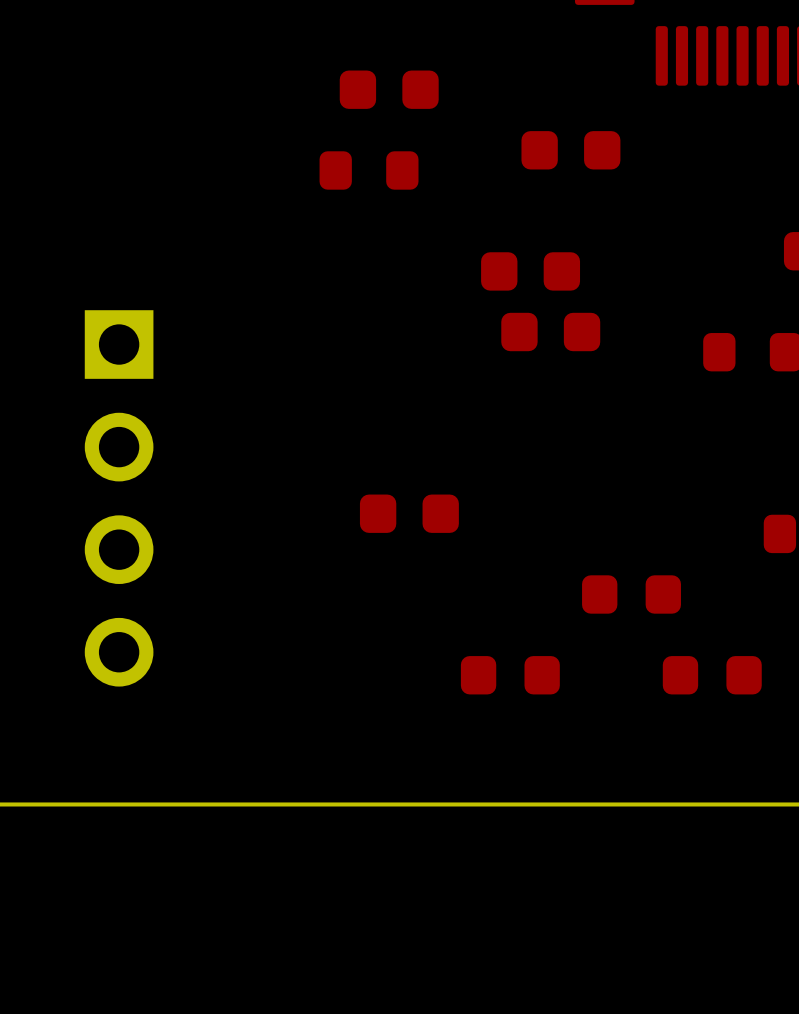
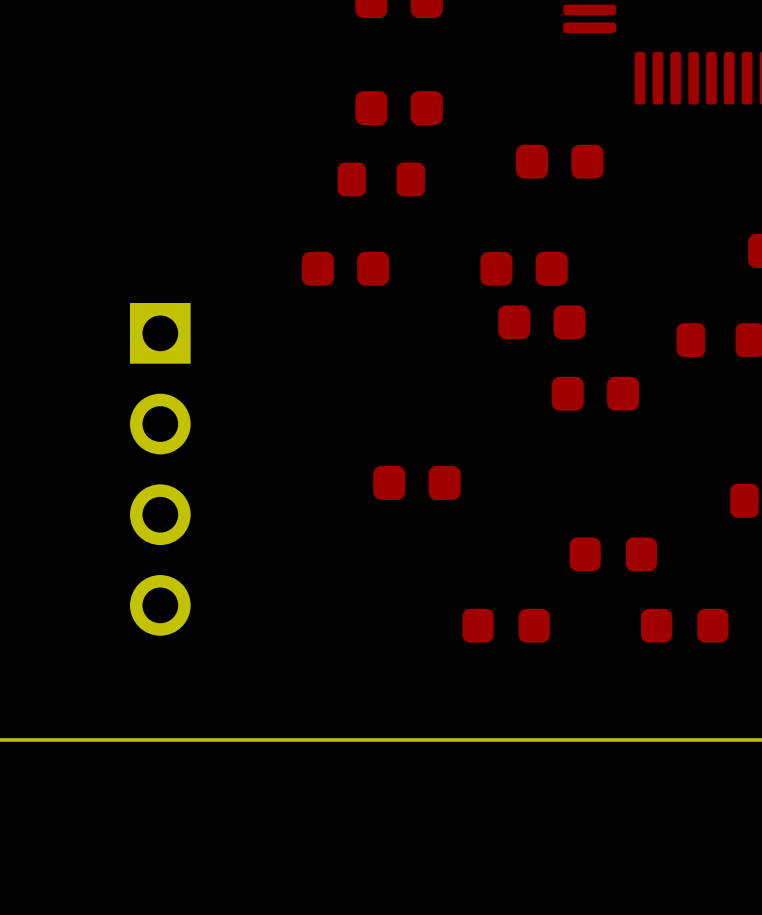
part: none -> (345, 268)
part: none -> (595, 393)

